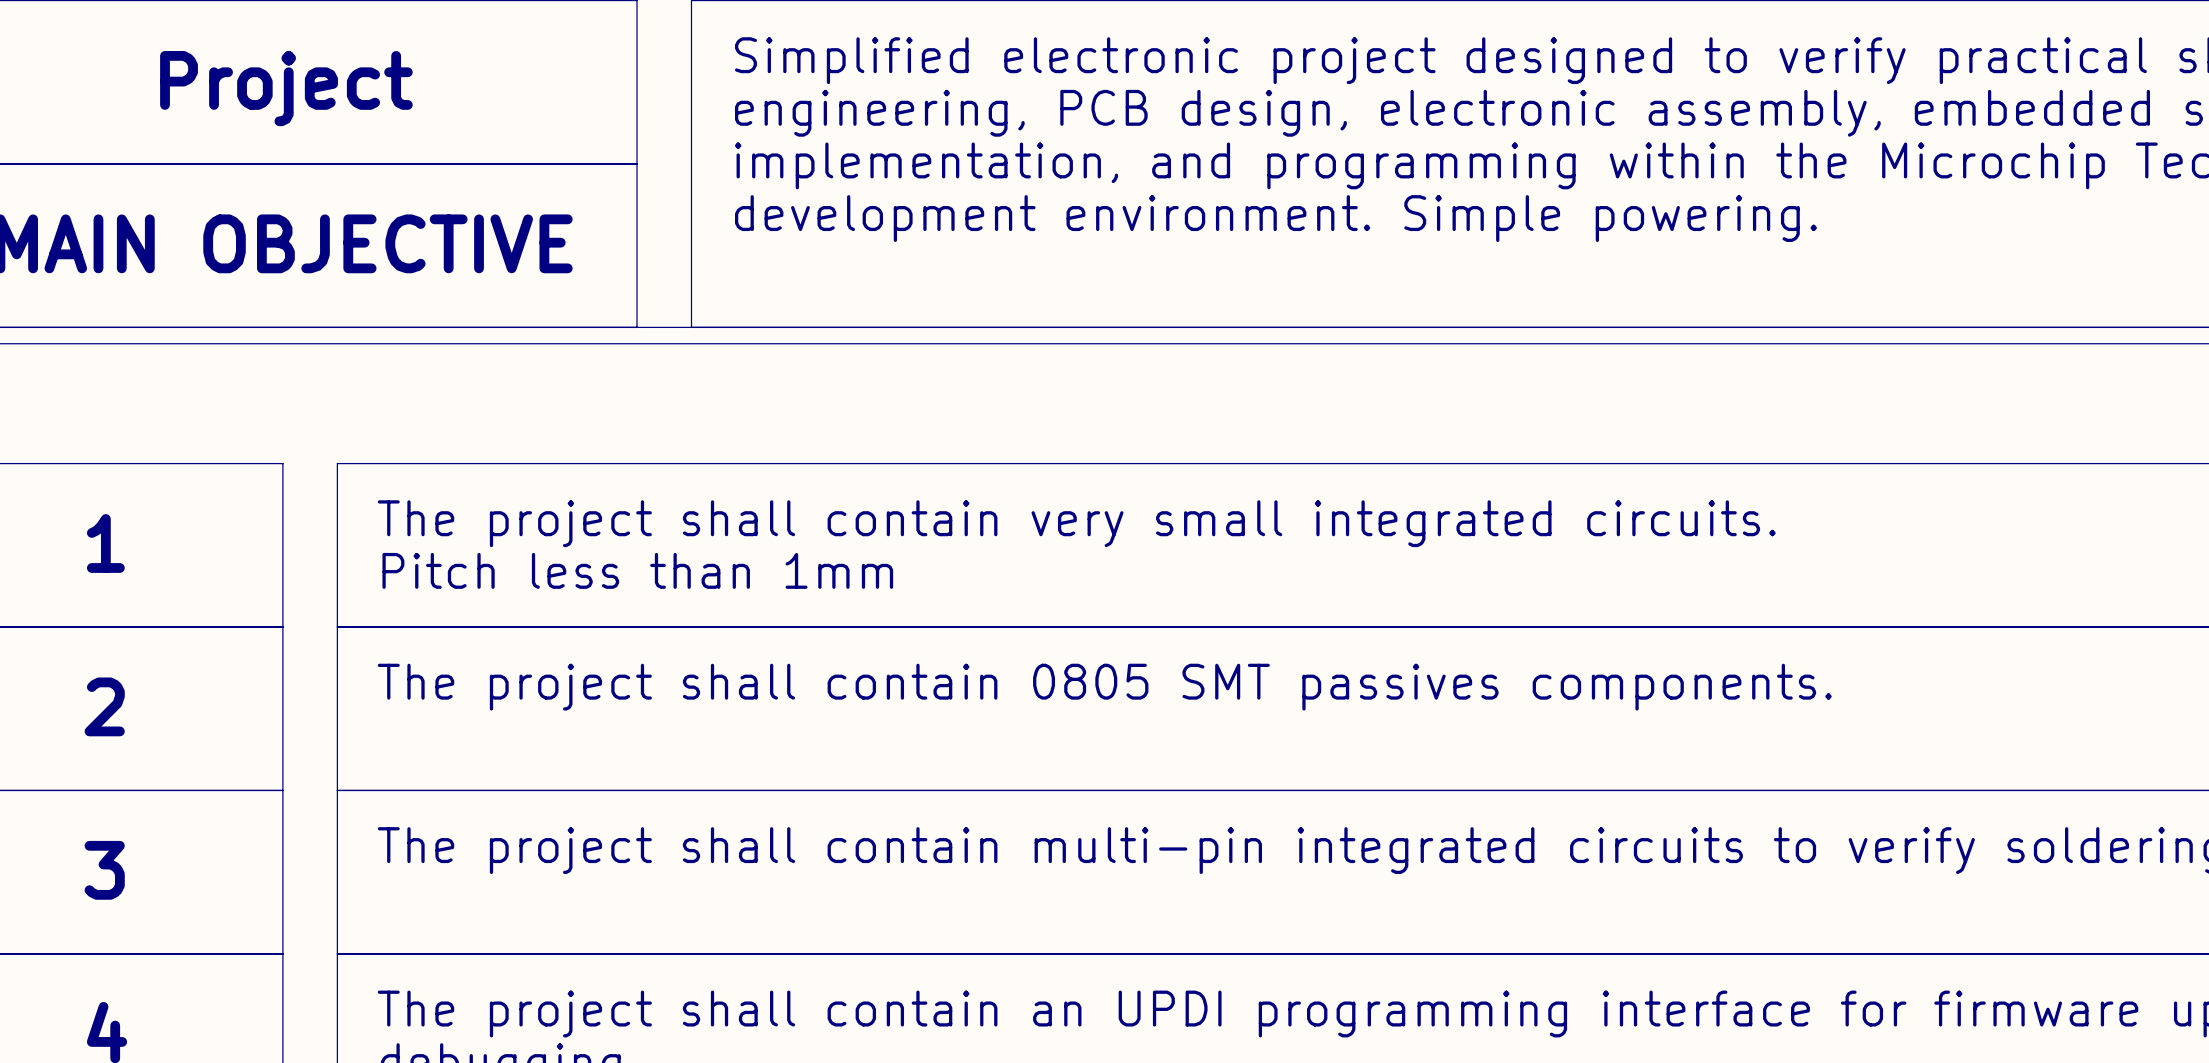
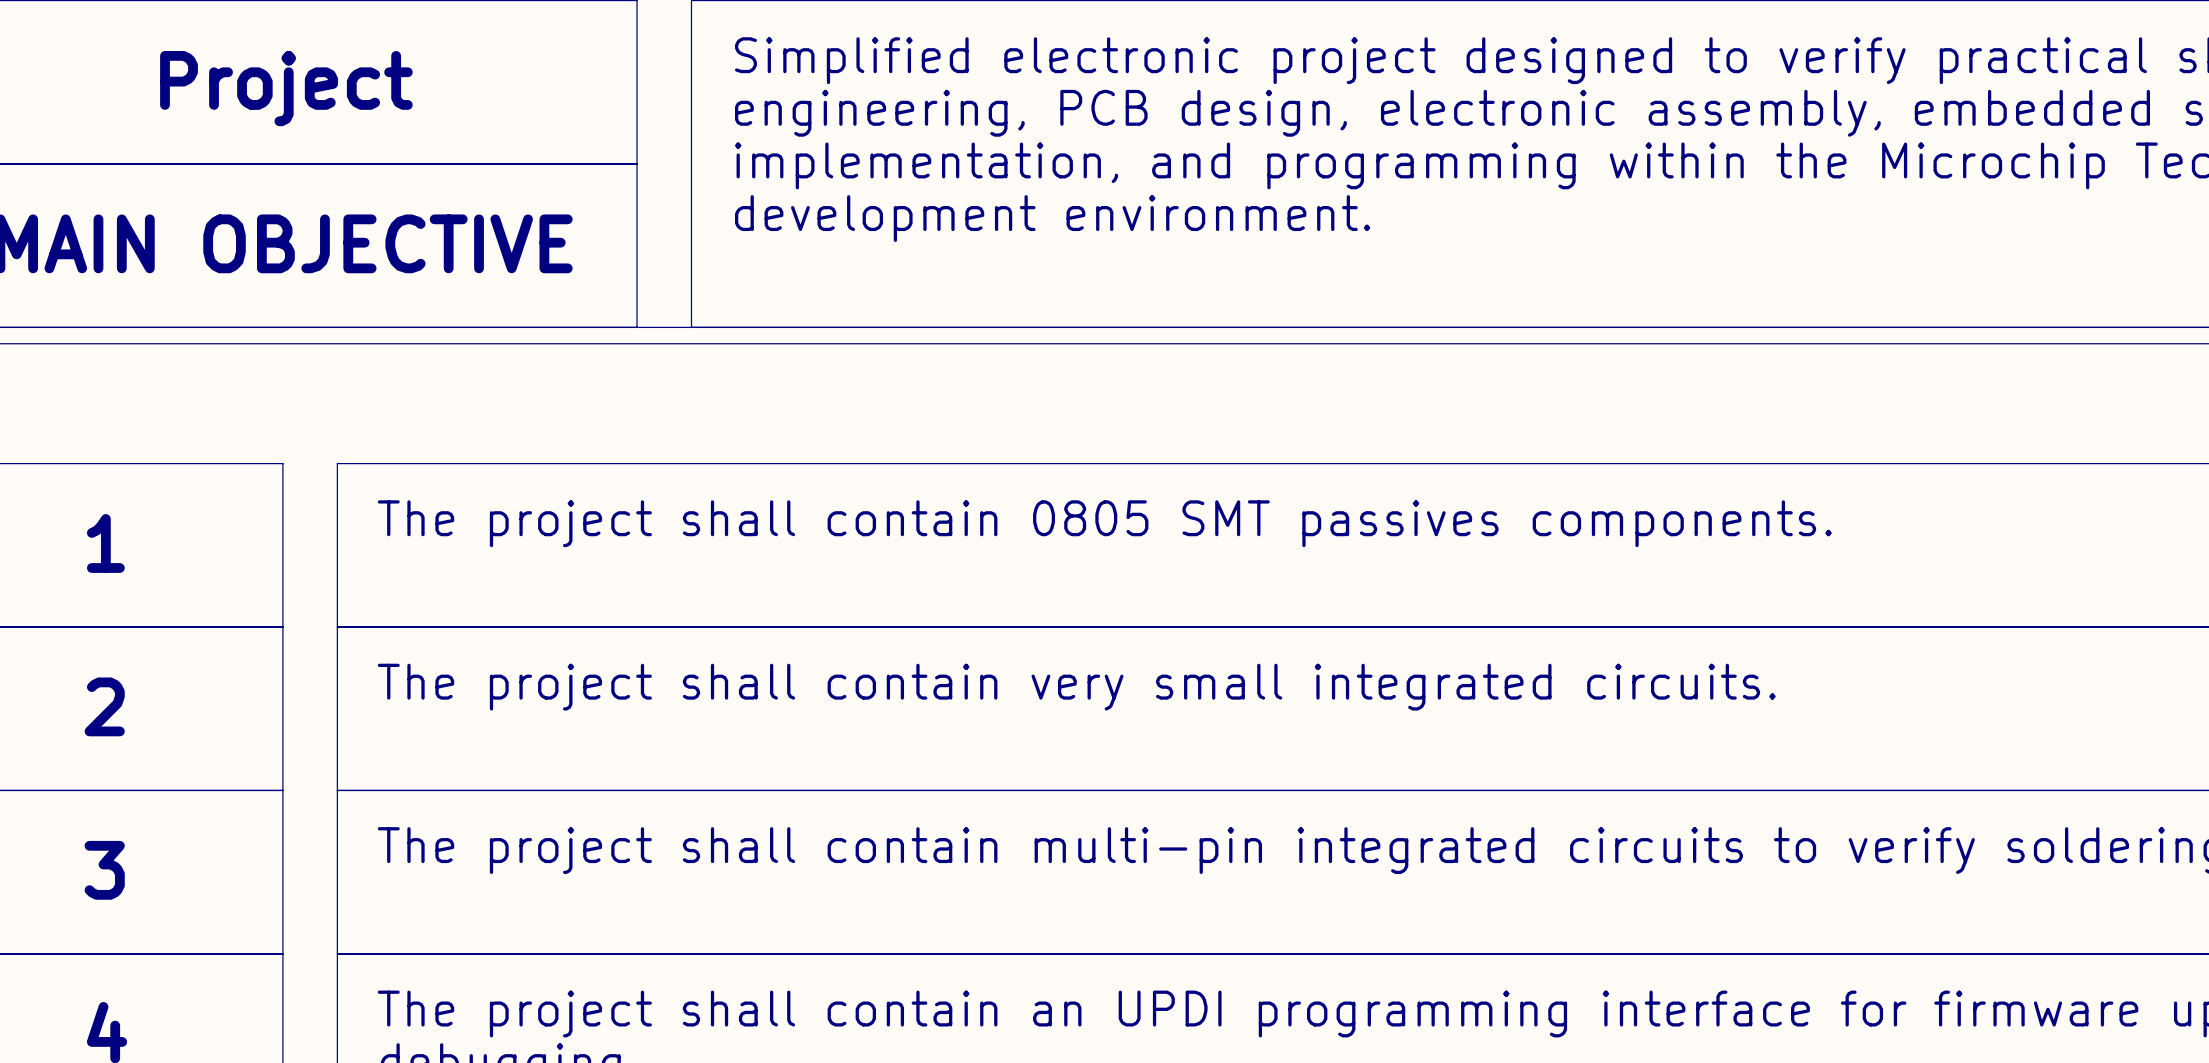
text: development environment. Simple powering. (1275, 218) -> development environment. (1052, 218)
text: The project shall contain very small integrated circuits. (1076, 523) -> The project shall contain 0805 SMT passives components. (1104, 523)
text: Pitch less than 1mm (637, 570) -> none
text: The project shall contain 0805 SMT passives components. (1104, 687) -> The project shall contain very small integrated circuits. (1076, 687)

